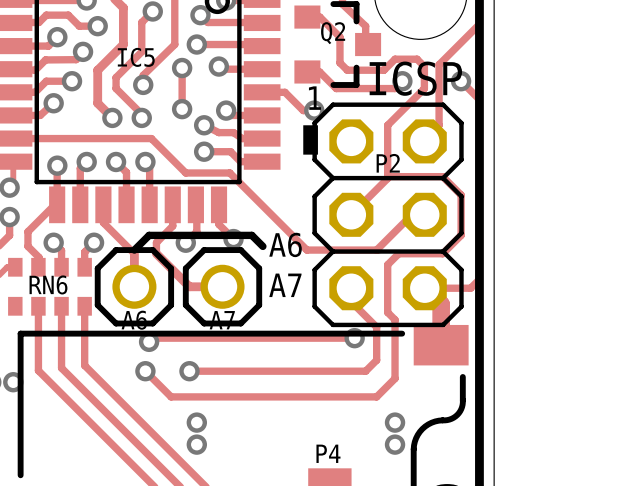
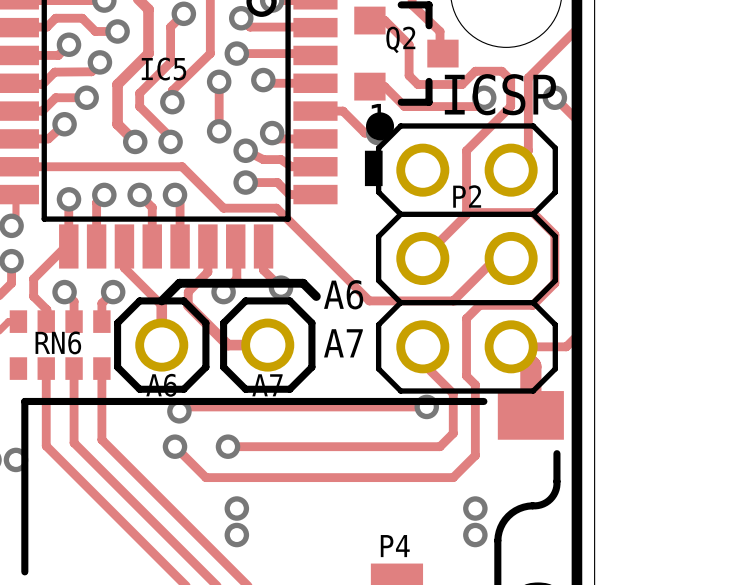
P2 footprint: [312, 102, 464, 328] -> [366, 112, 558, 394]

